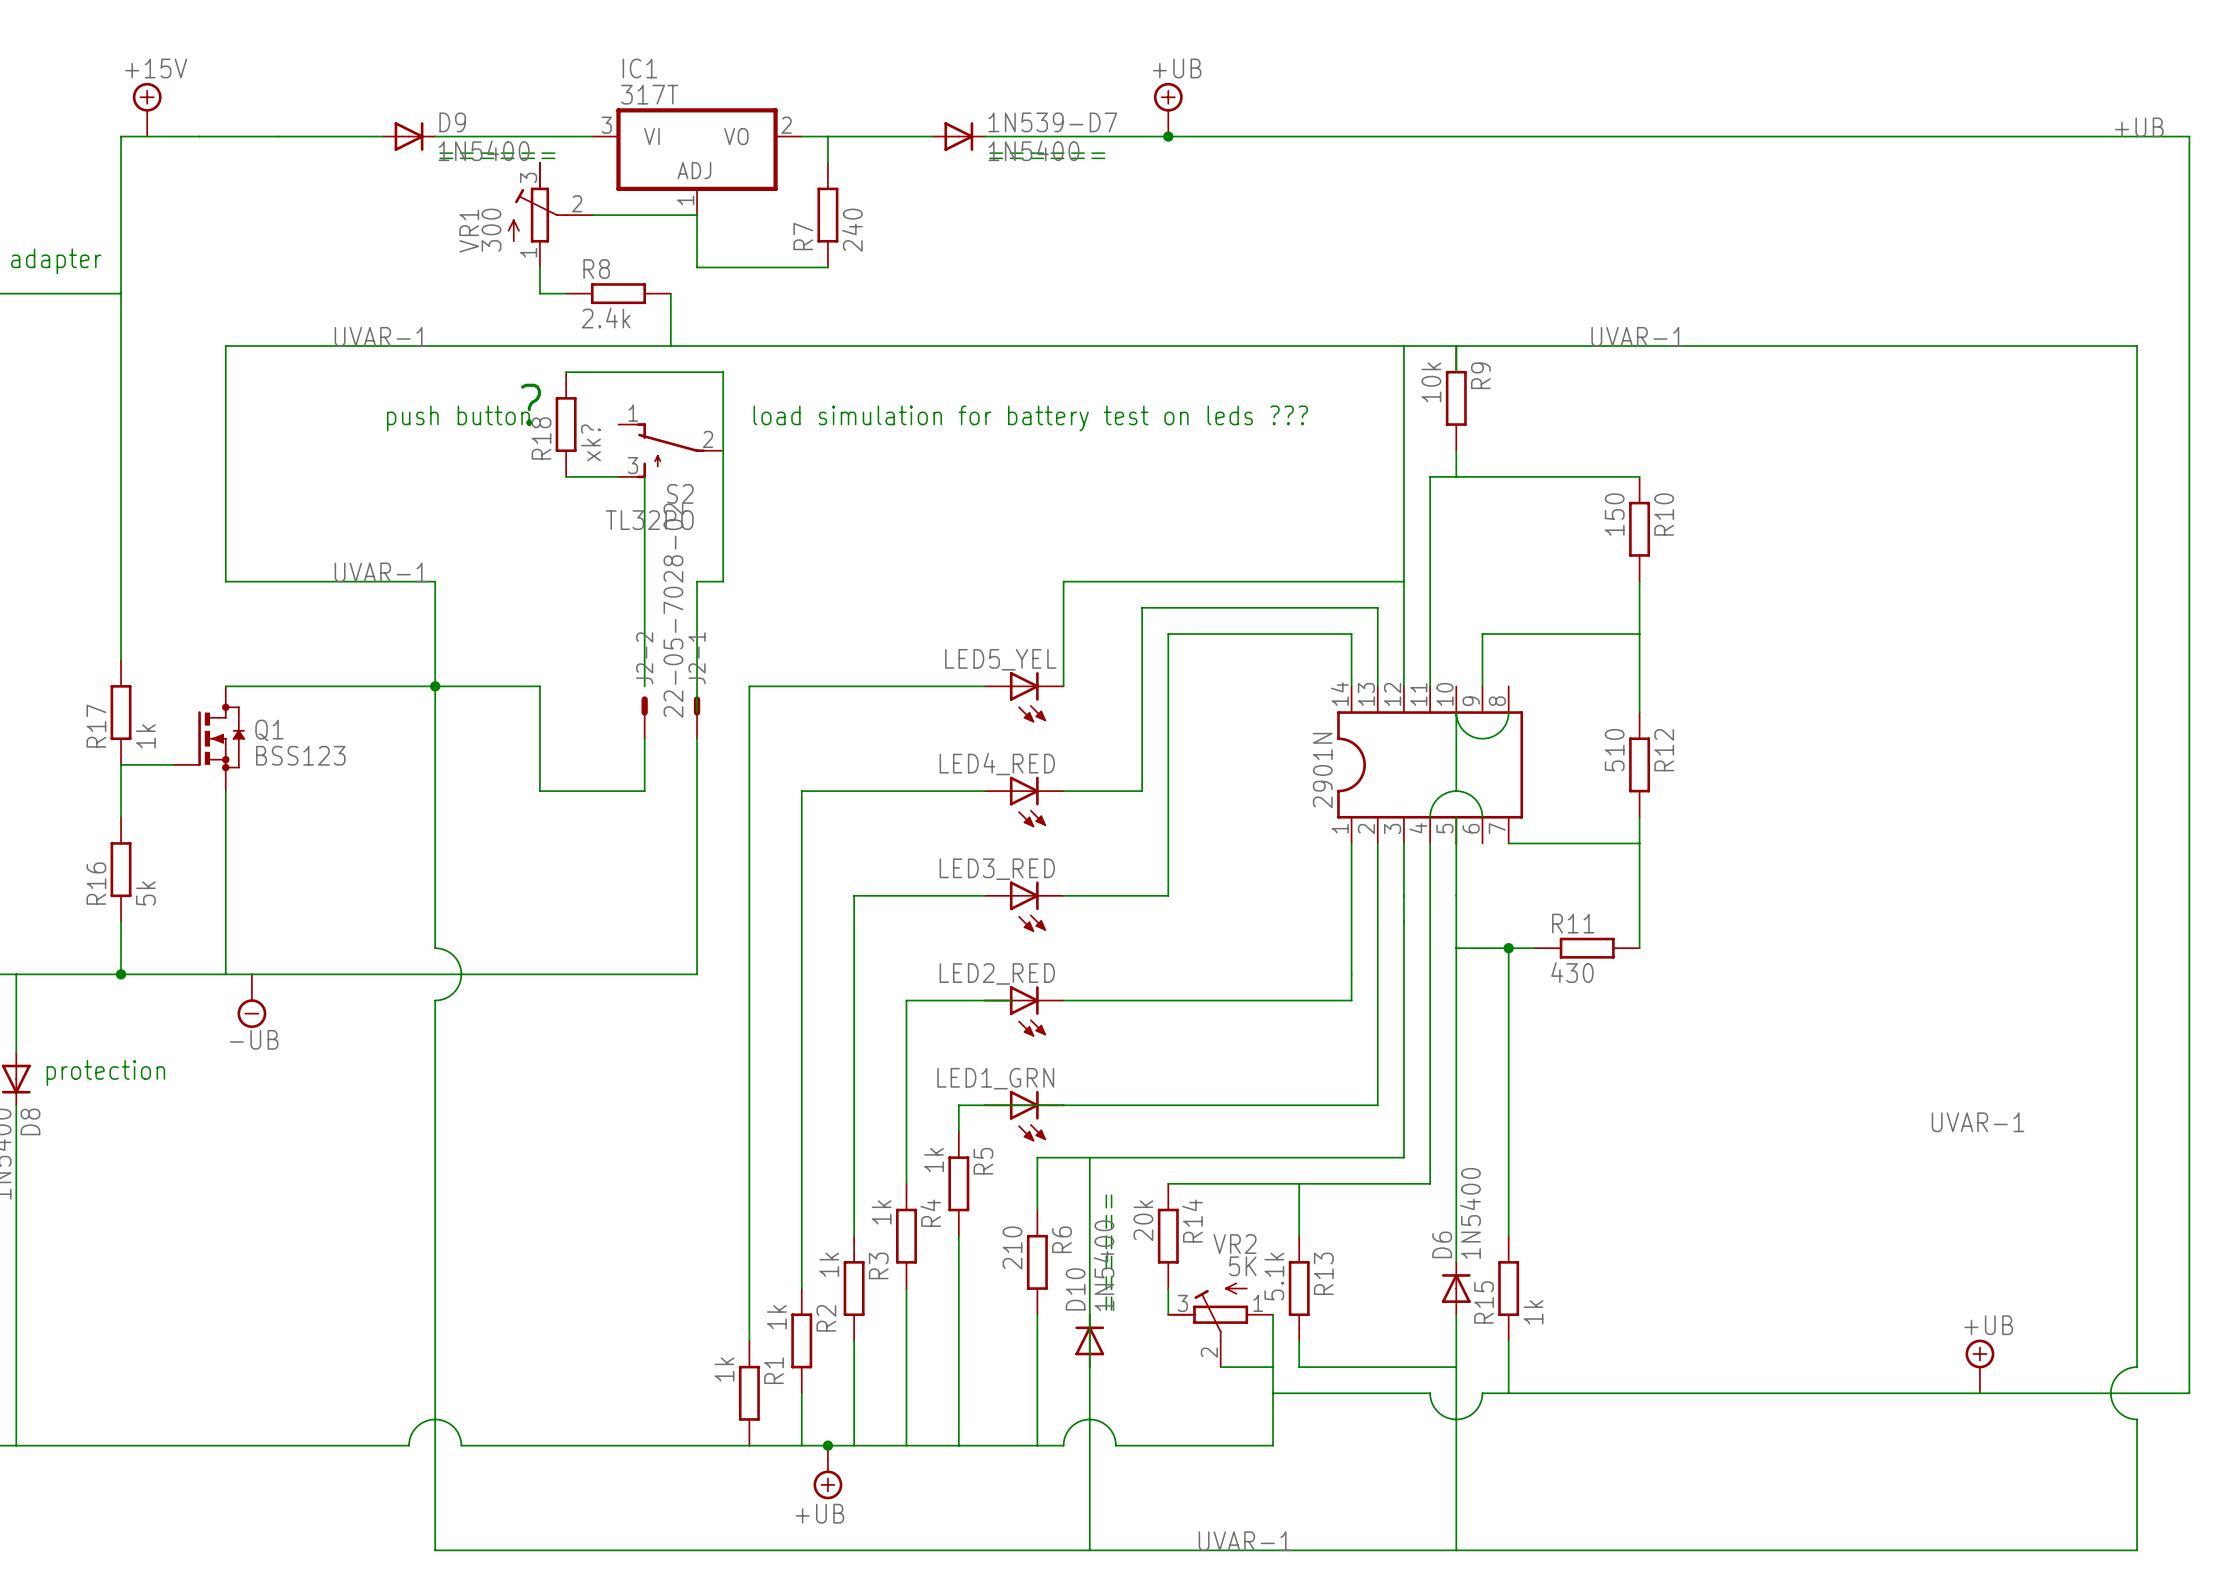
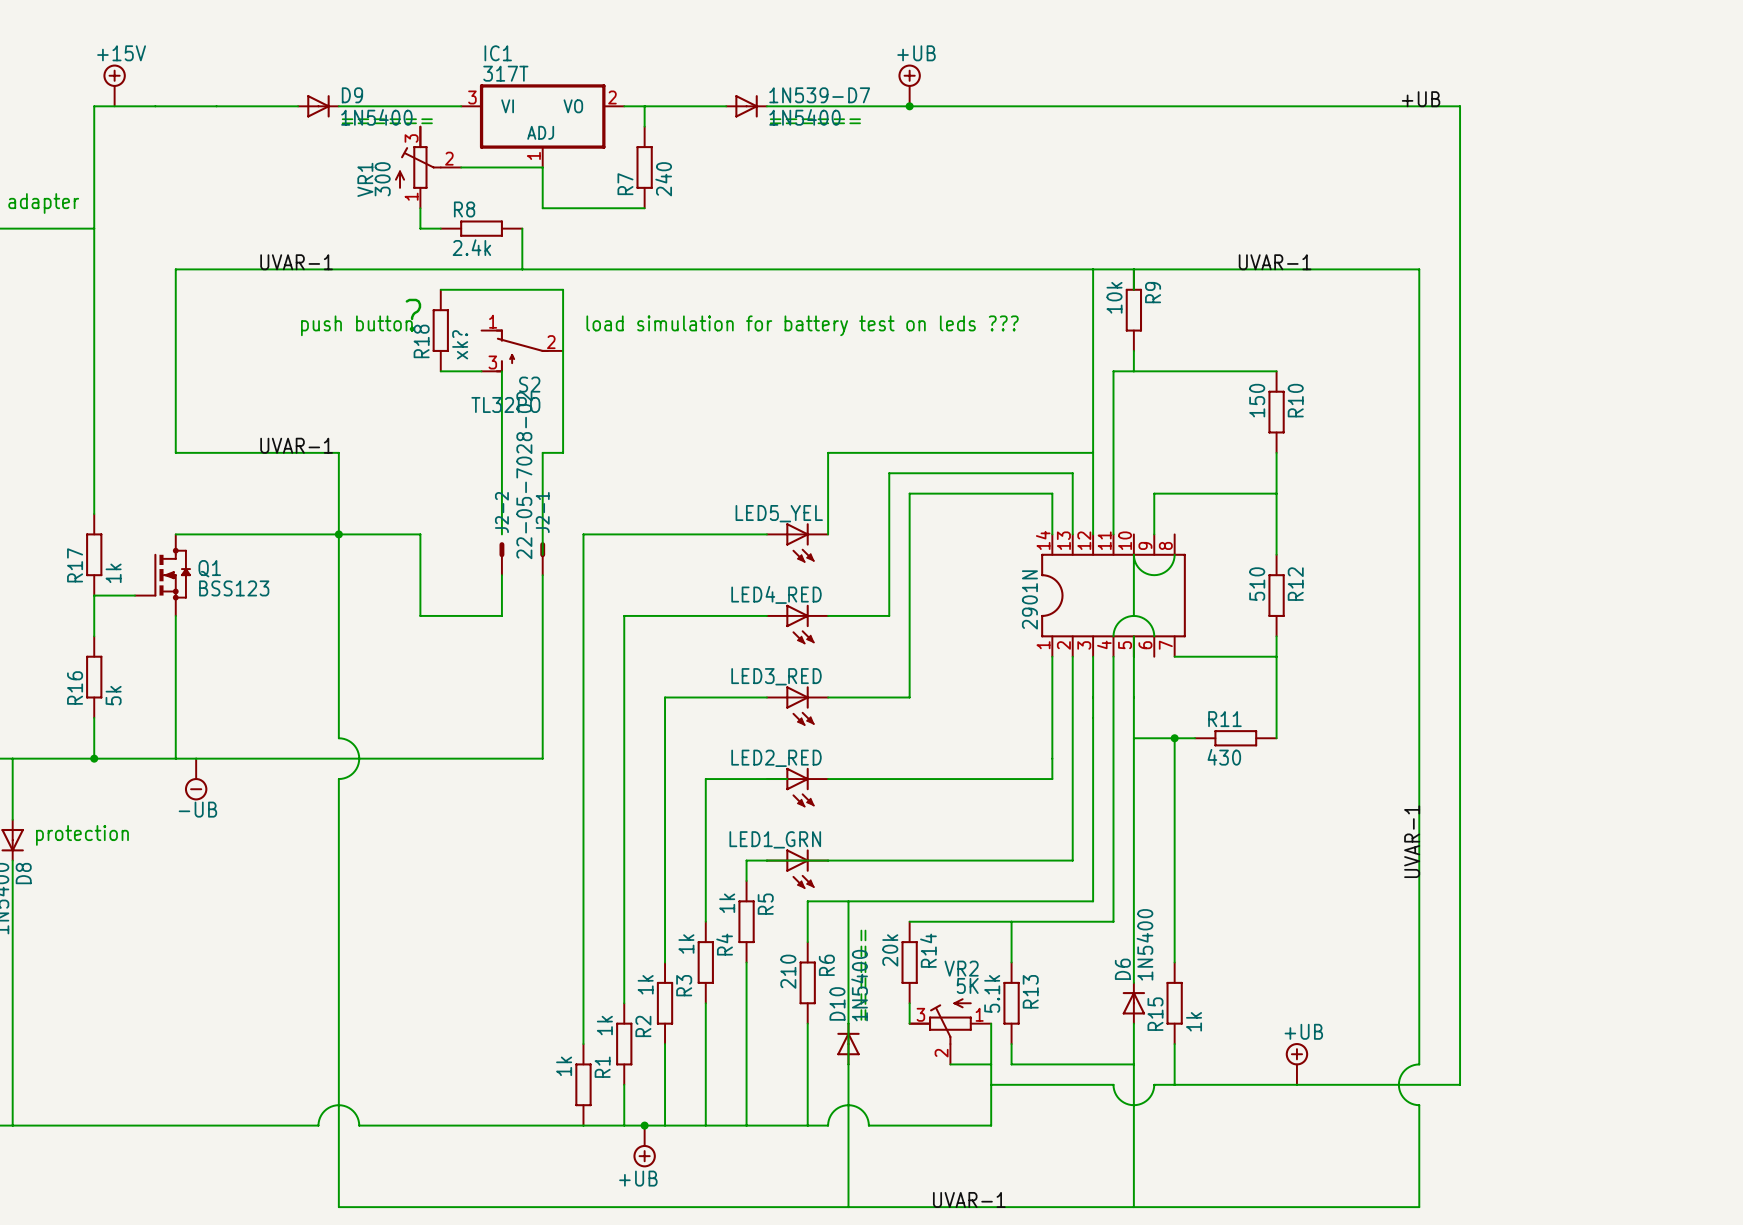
label: none -> +UB (1421, 99)
label: +UB (2139, 127) -> none
wire: (1875, 136) (2189, 136) (2189, 1393) (1875, 1393) -> (1460, 106) (1460, 1084)
wire: (1822, 346) (2137, 346) (2137, 1367) (2127, 1369) (2118, 1374) (2112, 1383) (2110, 1393) (2112, 1403) (2118, 1411) (2127, 1417) (2137, 1419) (2137, 1550) (1822, 1550) -> (1419, 269) (1419, 1064) (1411, 1065) (1404, 1070) (1400, 1077) (1398, 1084) (1400, 1092) (1404, 1099) (1411, 1103) (1419, 1105) (1419, 1207)
label rotation: 0° (1978, 1122) -> 90° counterclockwise (1412, 841)
label position: UVAR-1 (1978, 1122) -> UVAR-1 (1412, 841)
power symbol: none -> +UB (1296, 1063)
power symbol: +UB (1979, 1366) -> none

